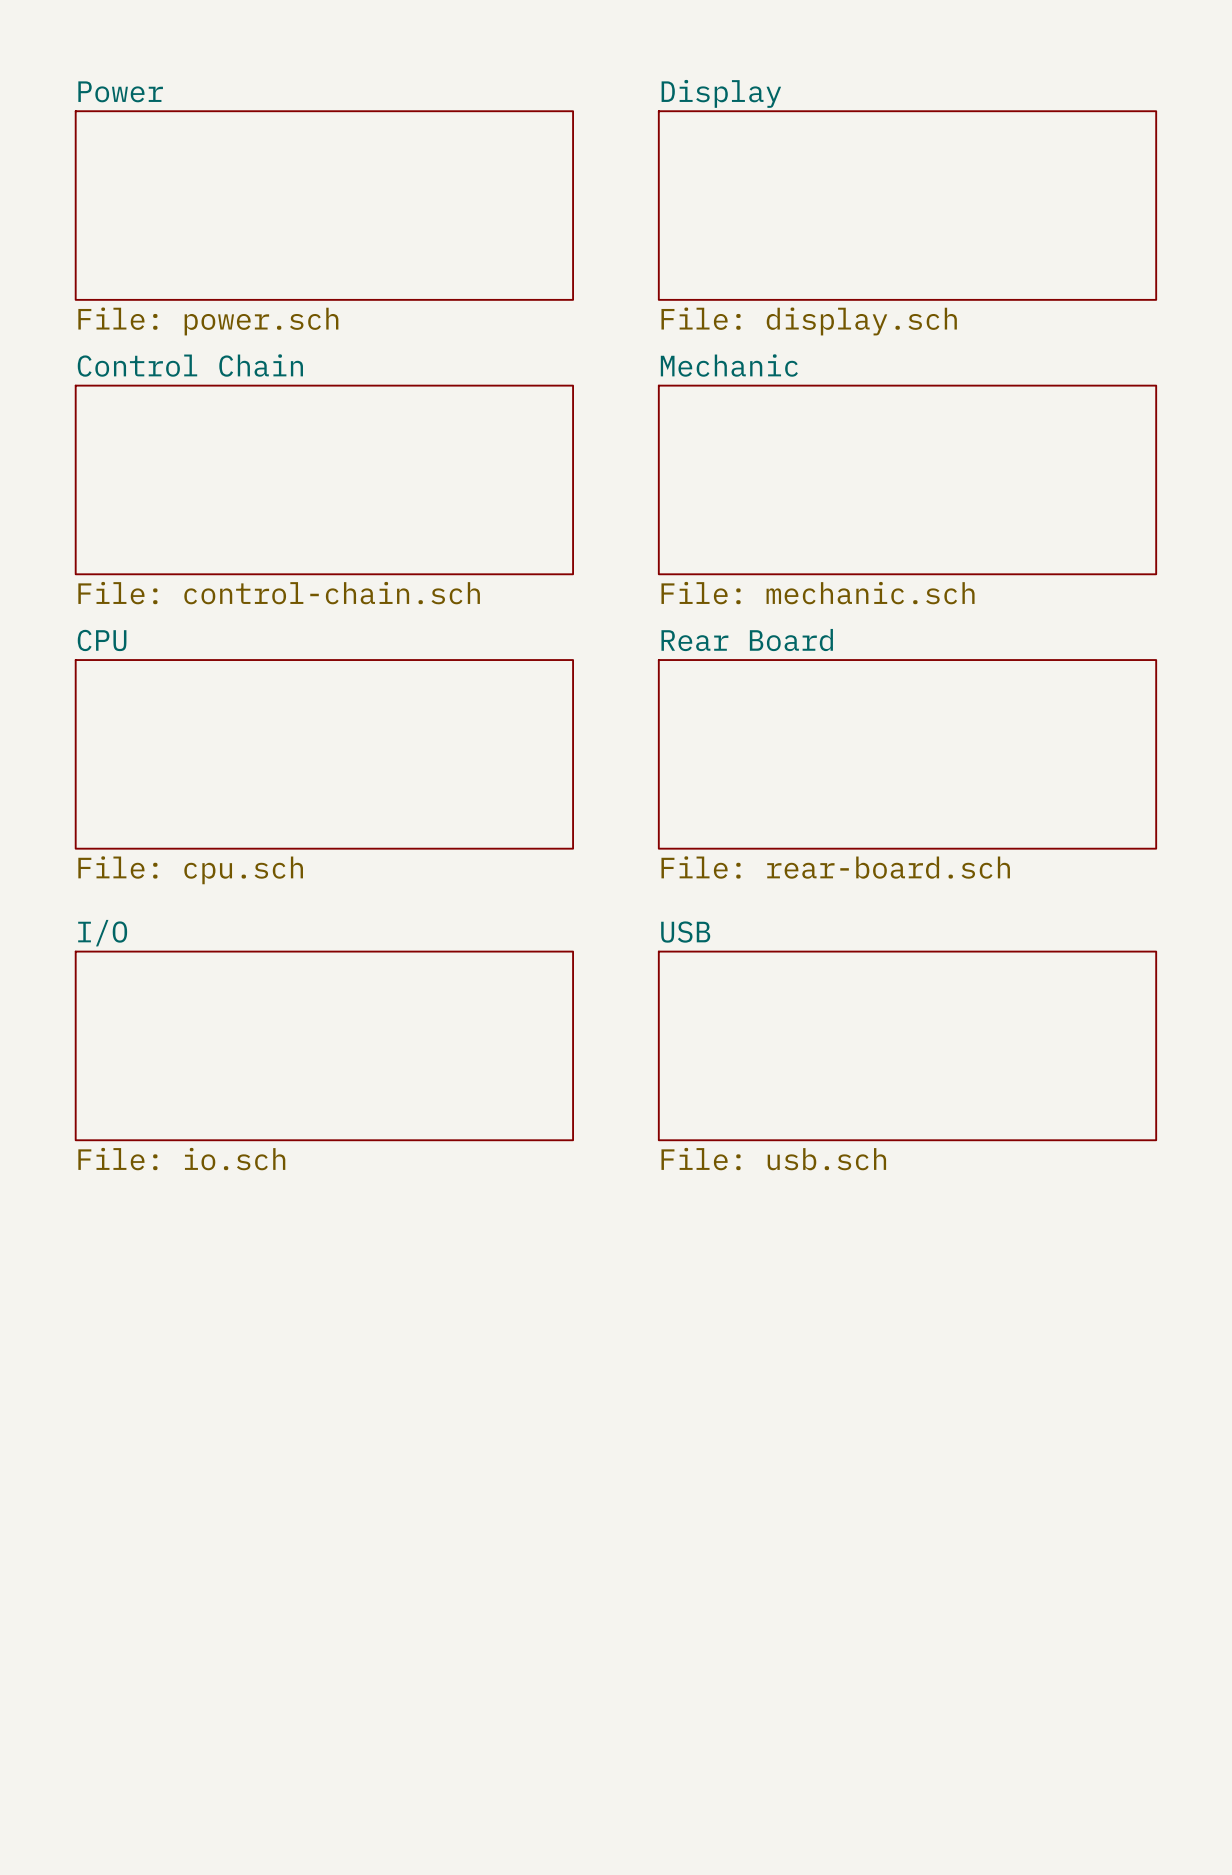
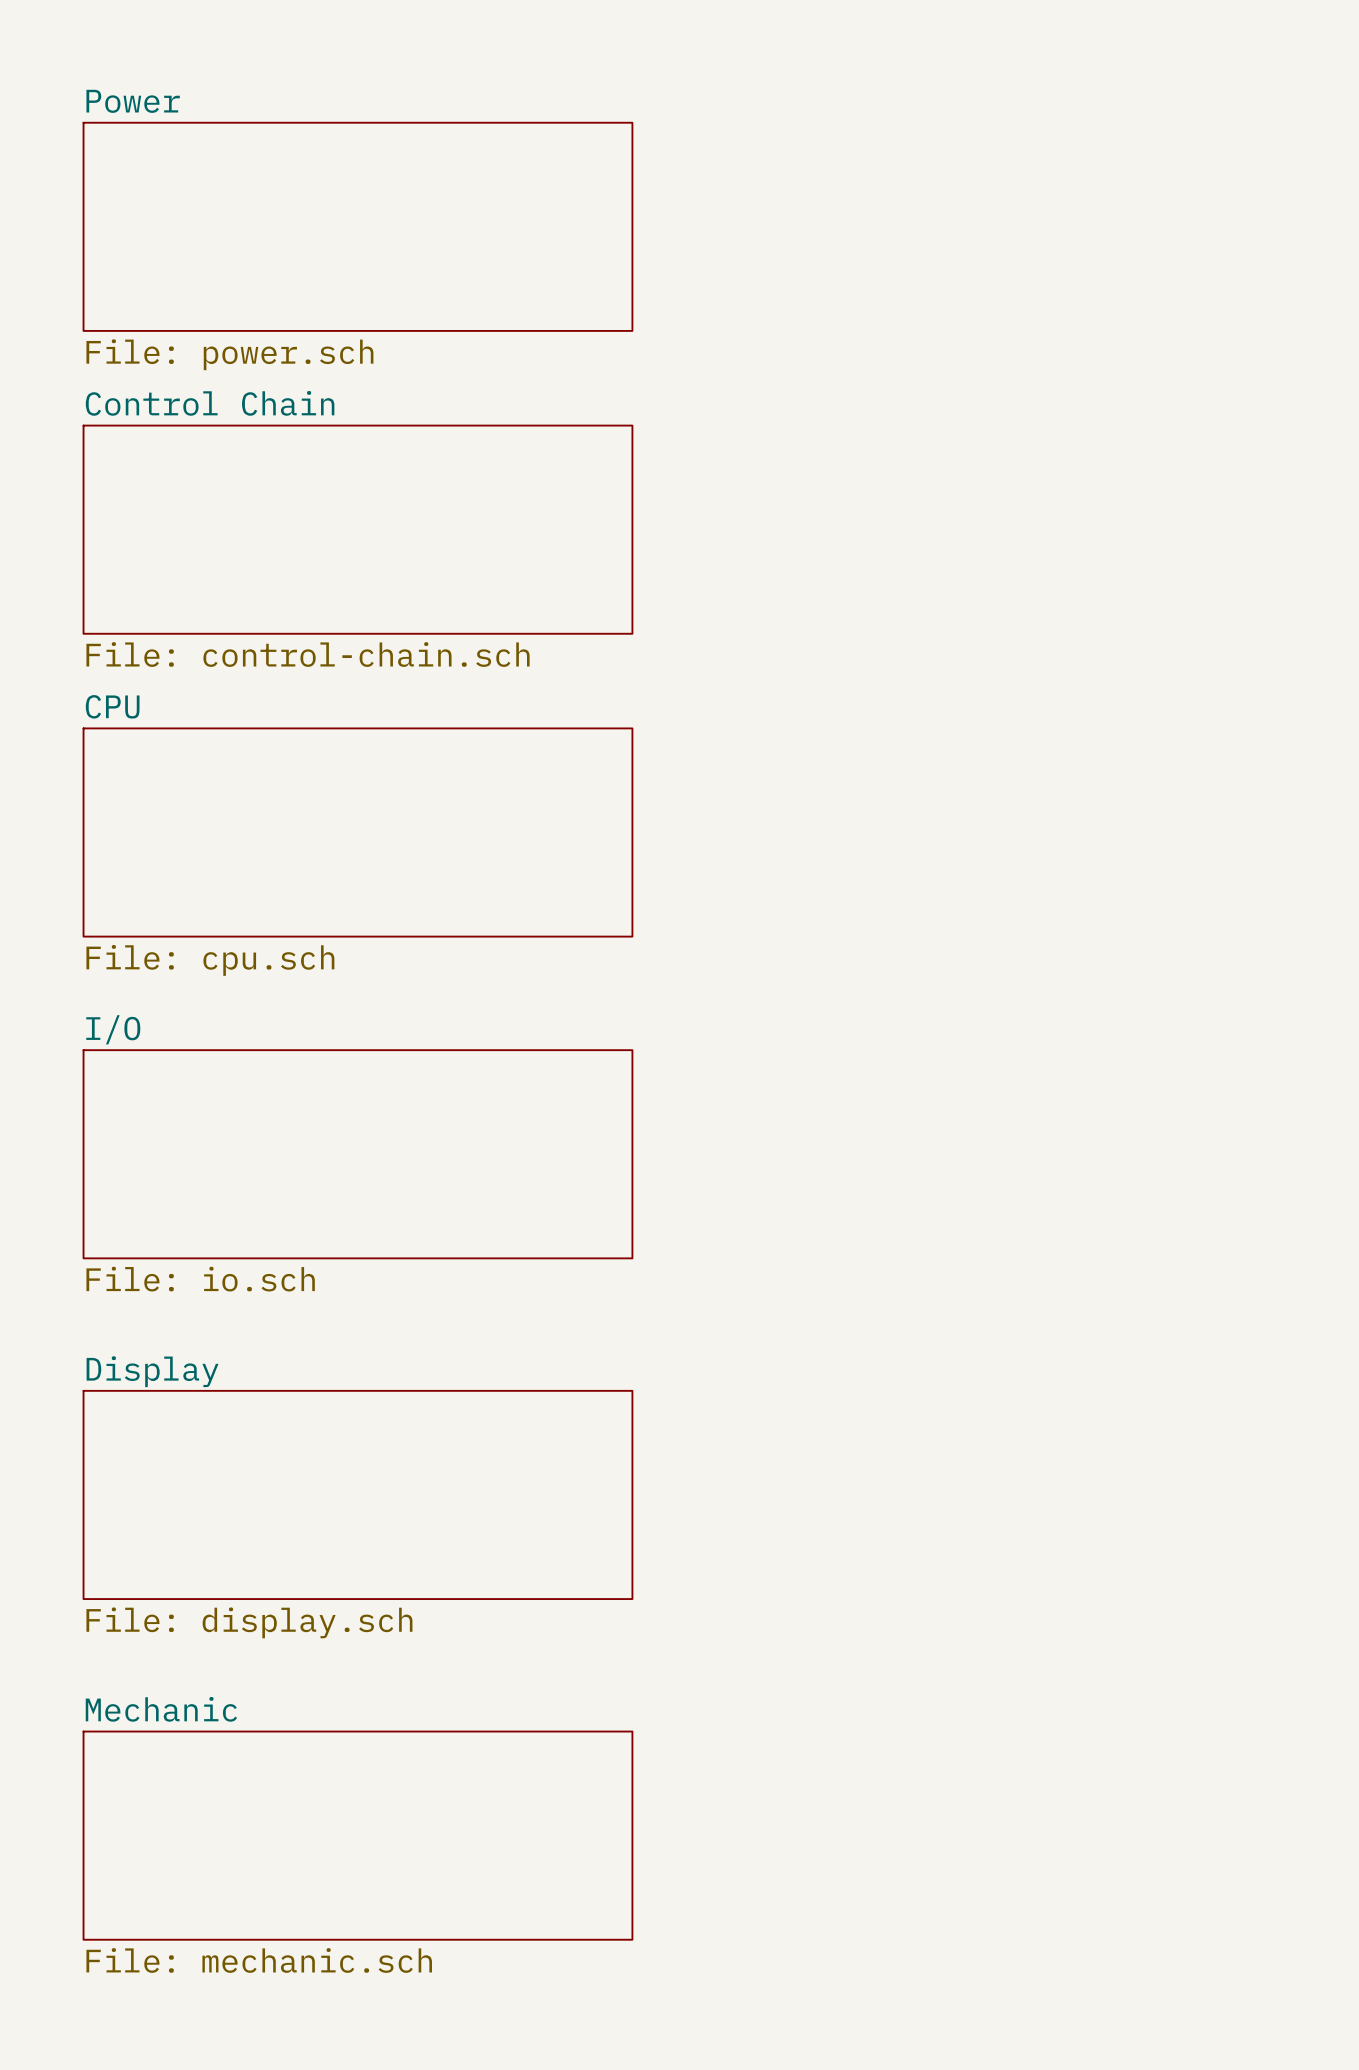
sheet Display: File: display.sch (907, 205) -> none
sheet Mechanic: File: mechanic.sch (907, 479) -> none
sheet Rear Board: File: rear-board.sch (907, 754) -> none
sheet USB: File: usb.sch (907, 1045) -> none
sheet Display: none -> File: display.sch (357, 1494)
sheet Mechanic: none -> File: mechanic.sch (357, 1835)

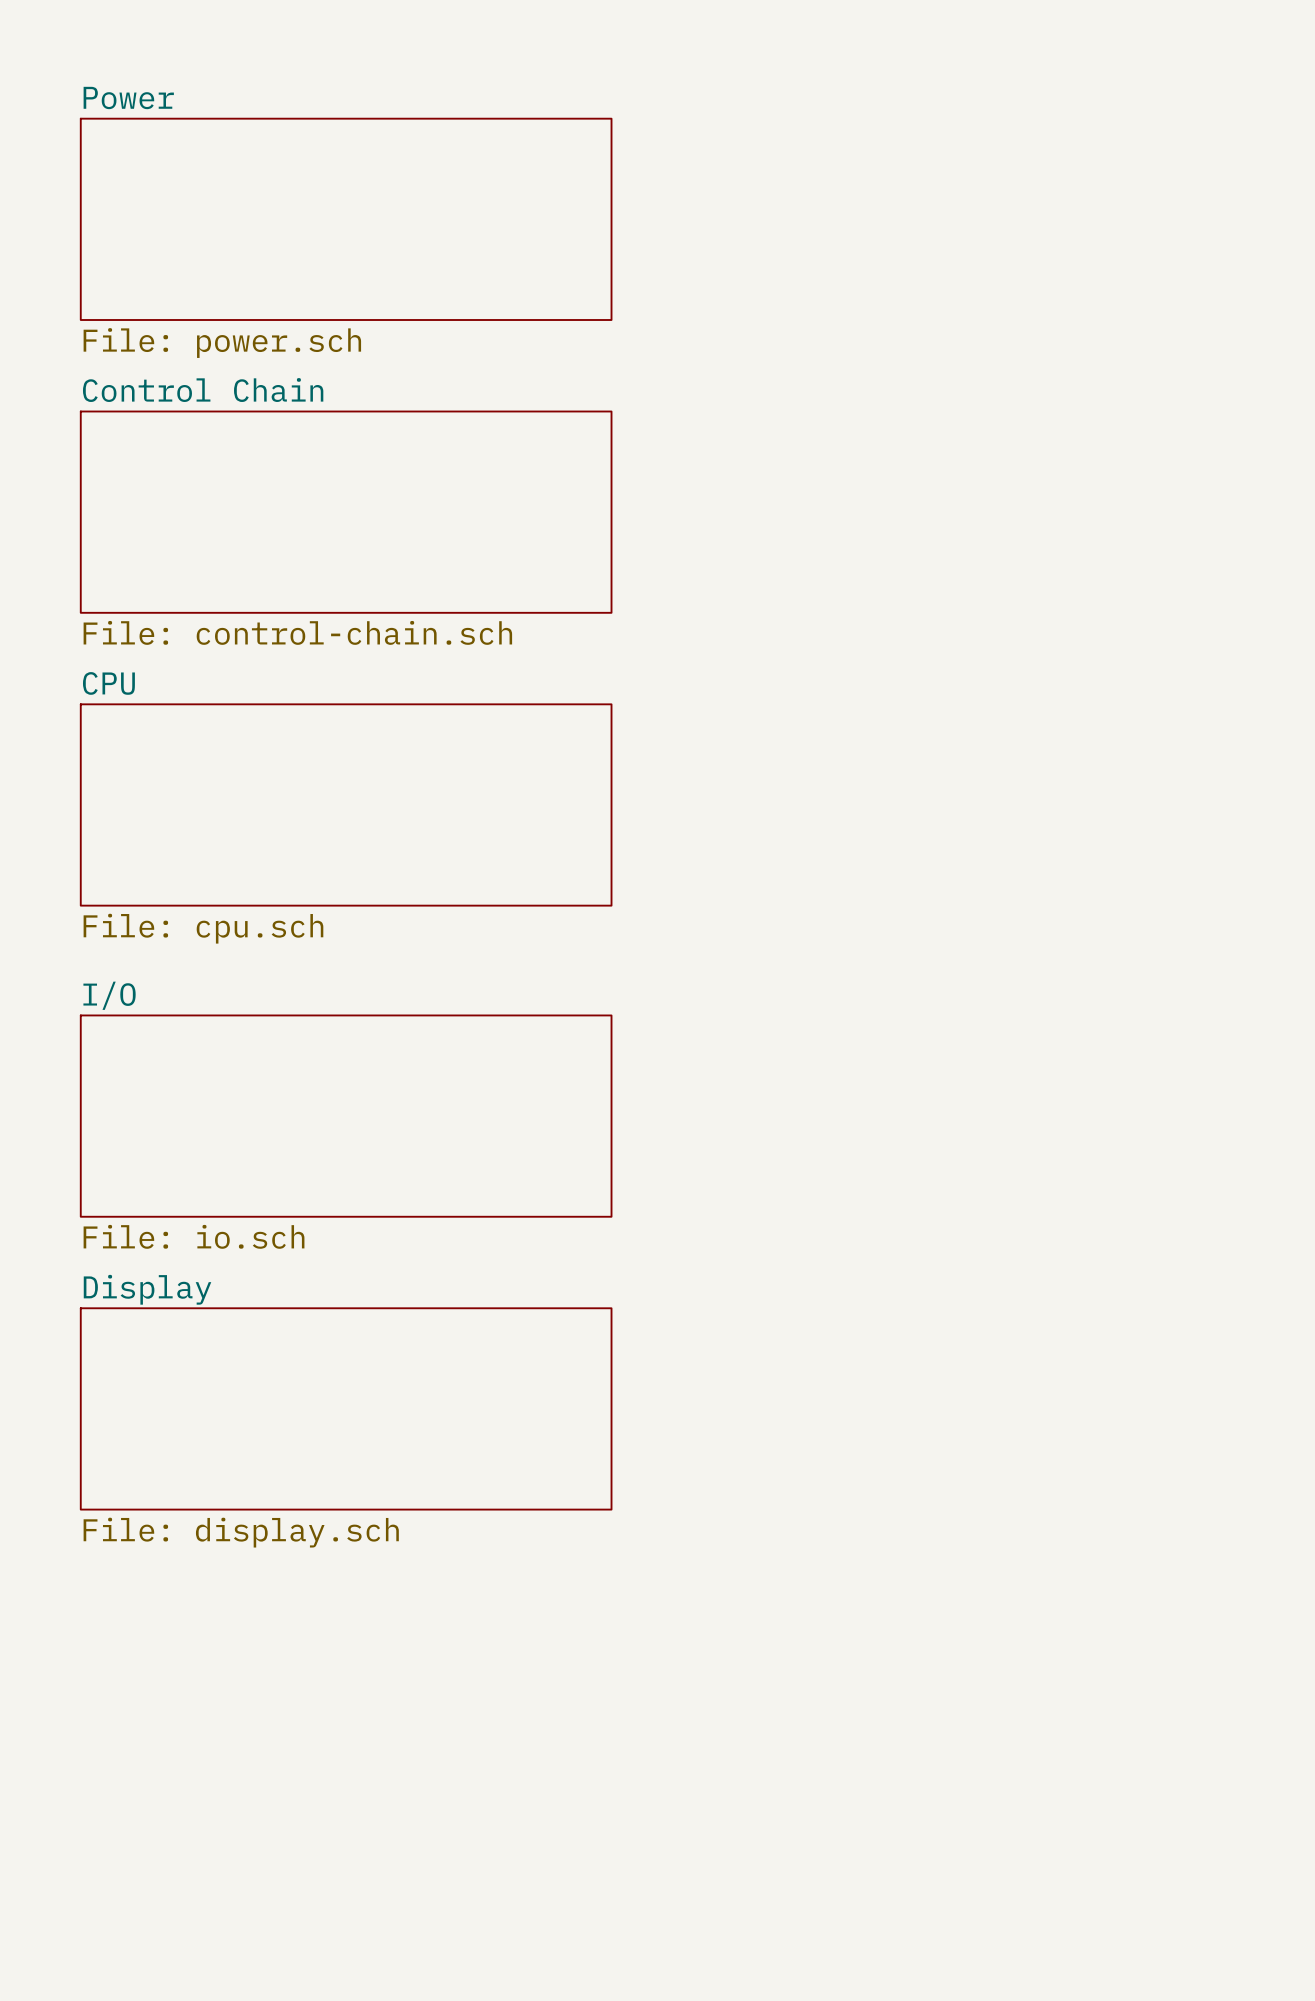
sheet Display position: (357, 1494) -> (346, 1408)
sheet Mechanic: File: mechanic.sch (357, 1835) -> none

